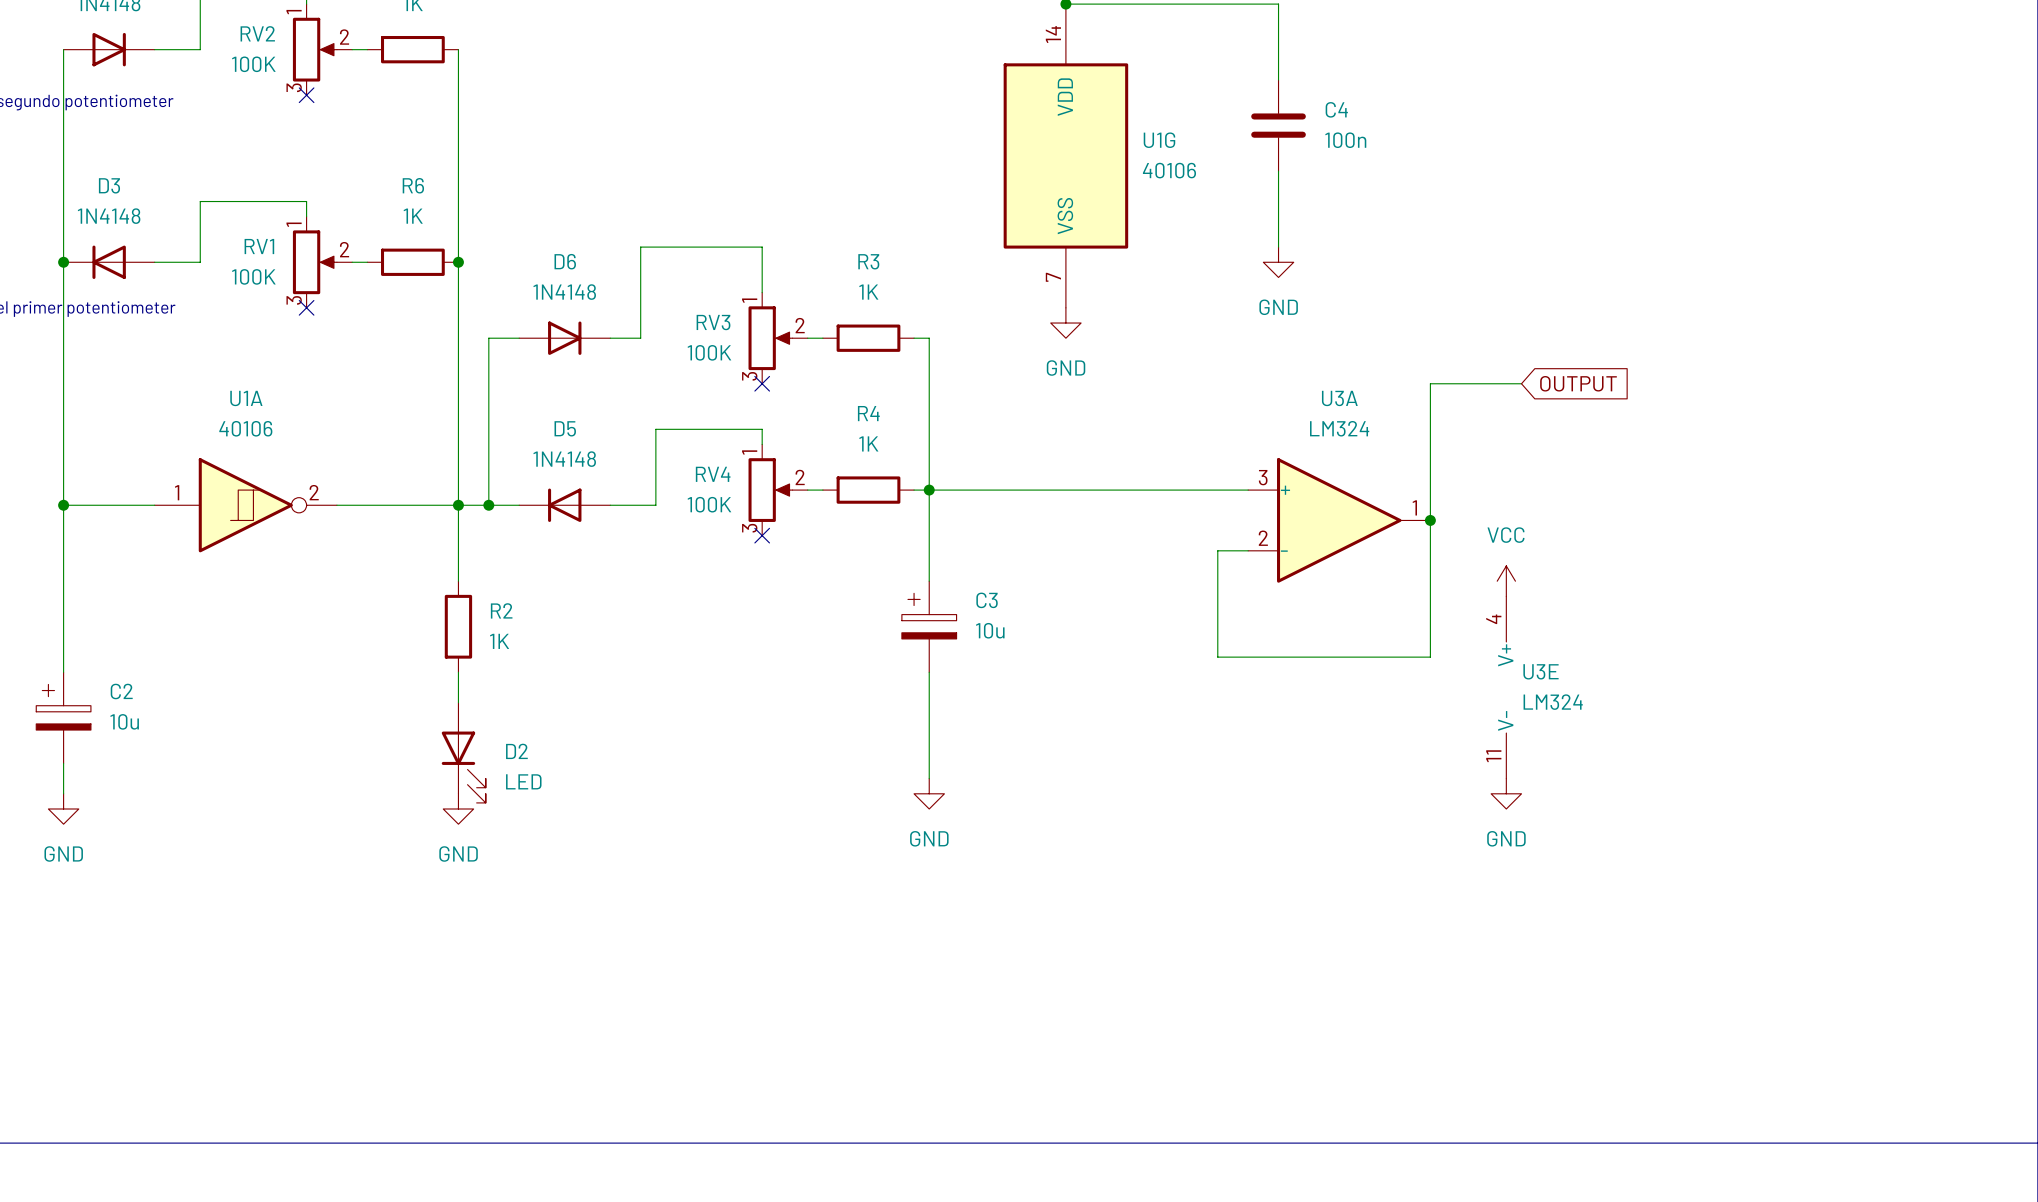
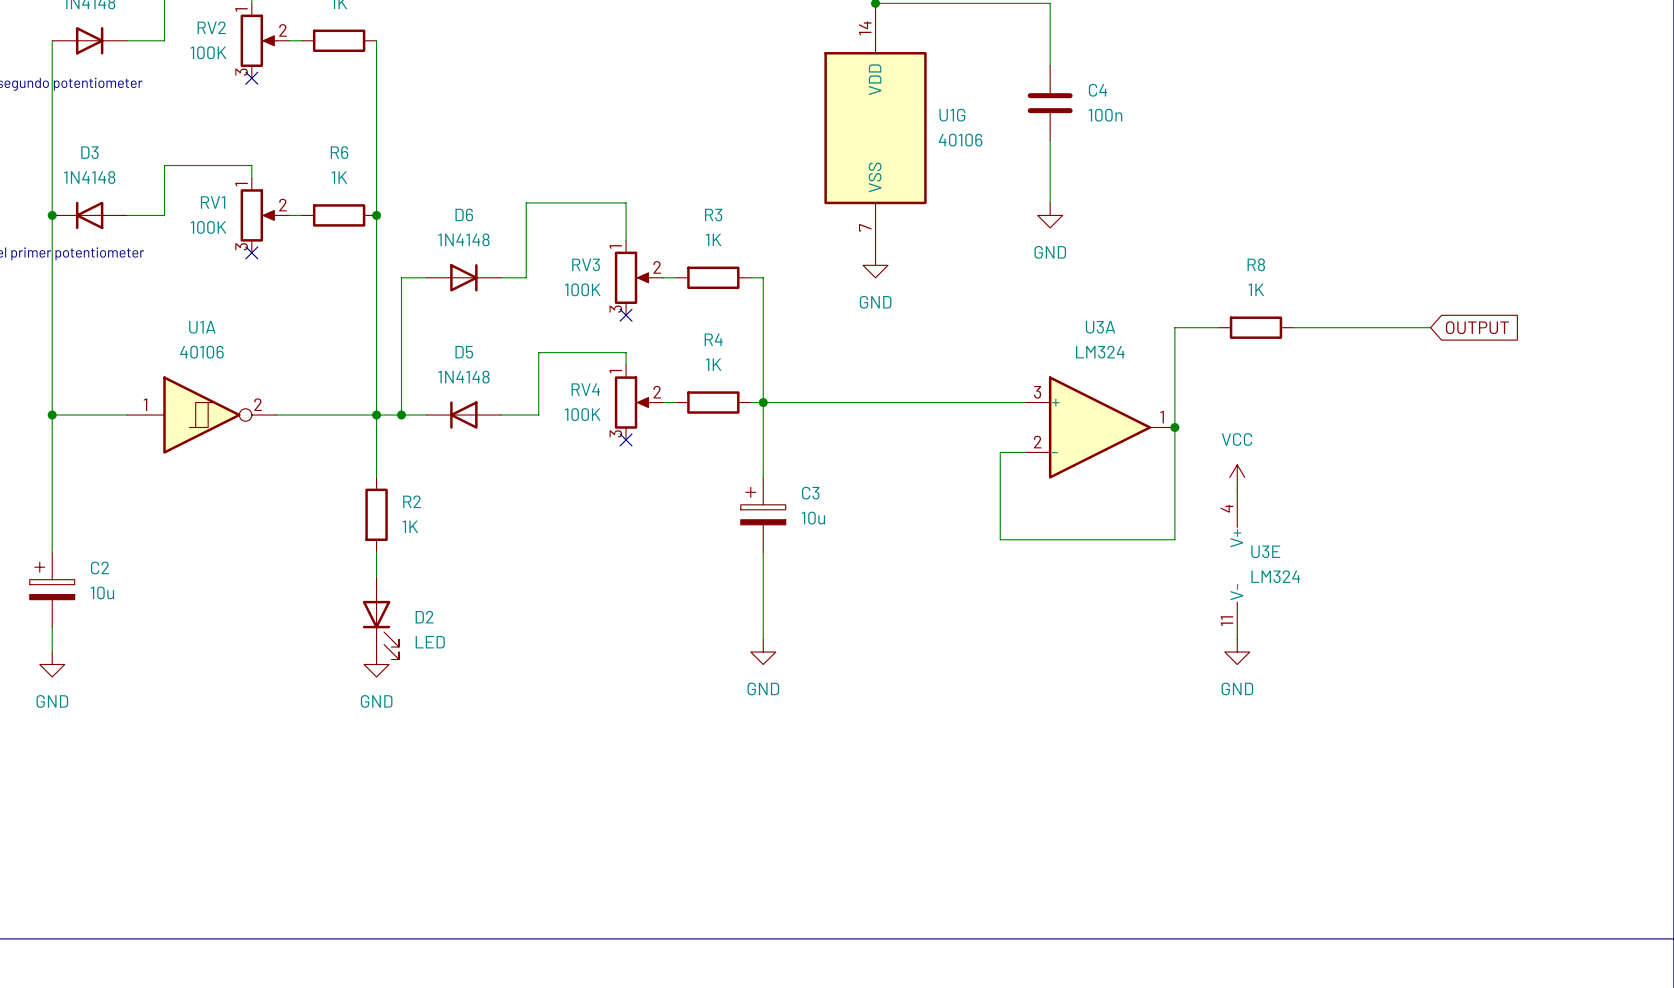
wire: (1521, 383) (1430, 383) (1430, 398) -> (1218, 327) (1174, 327)
global label position: OUTPUT (1578, 383) -> OUTPUT (1477, 327)
R8: none -> 1K (1255, 327)
wire: none -> (1293, 327) (1430, 327)

